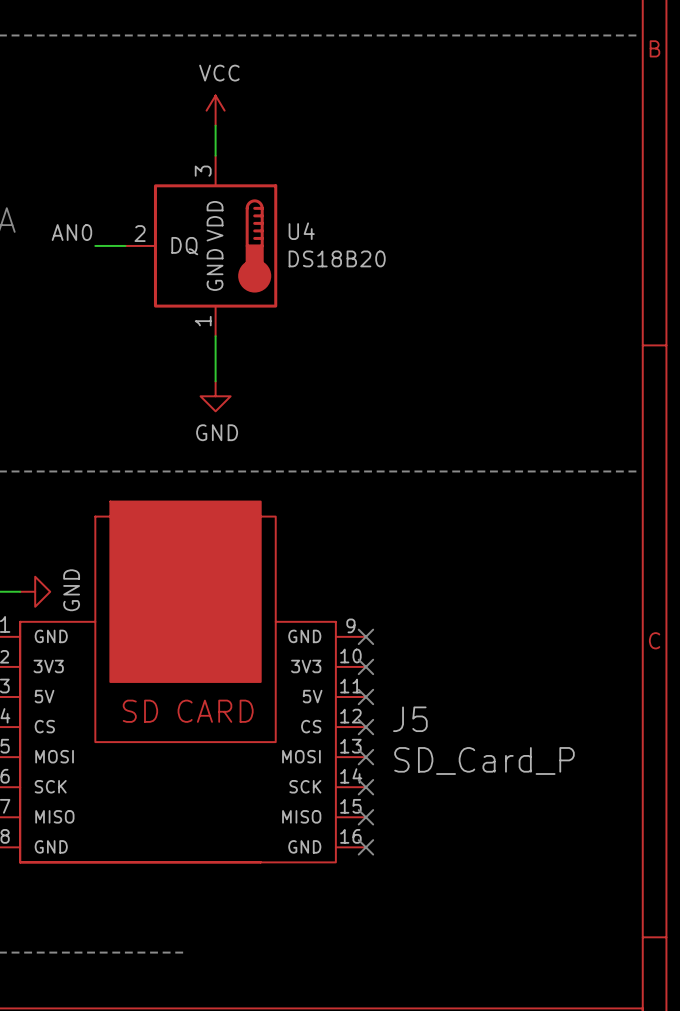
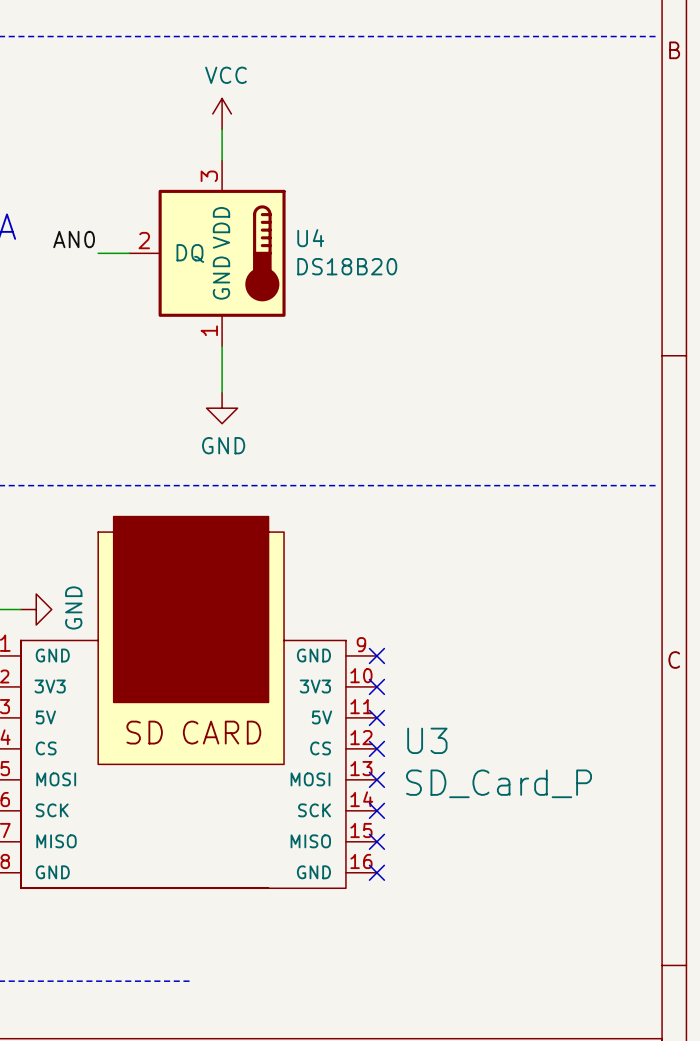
J5 name: J5 (410, 719) -> U3 (427, 740)

